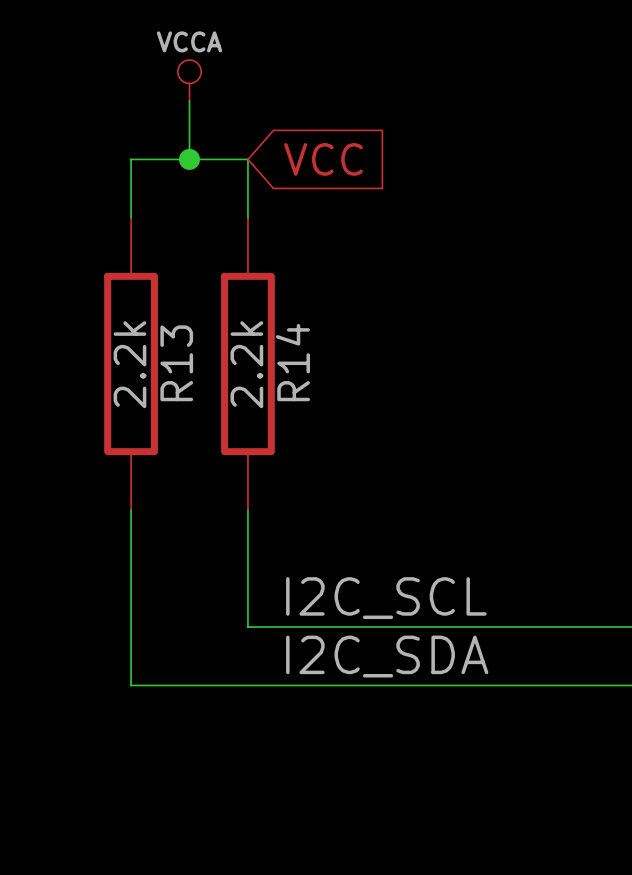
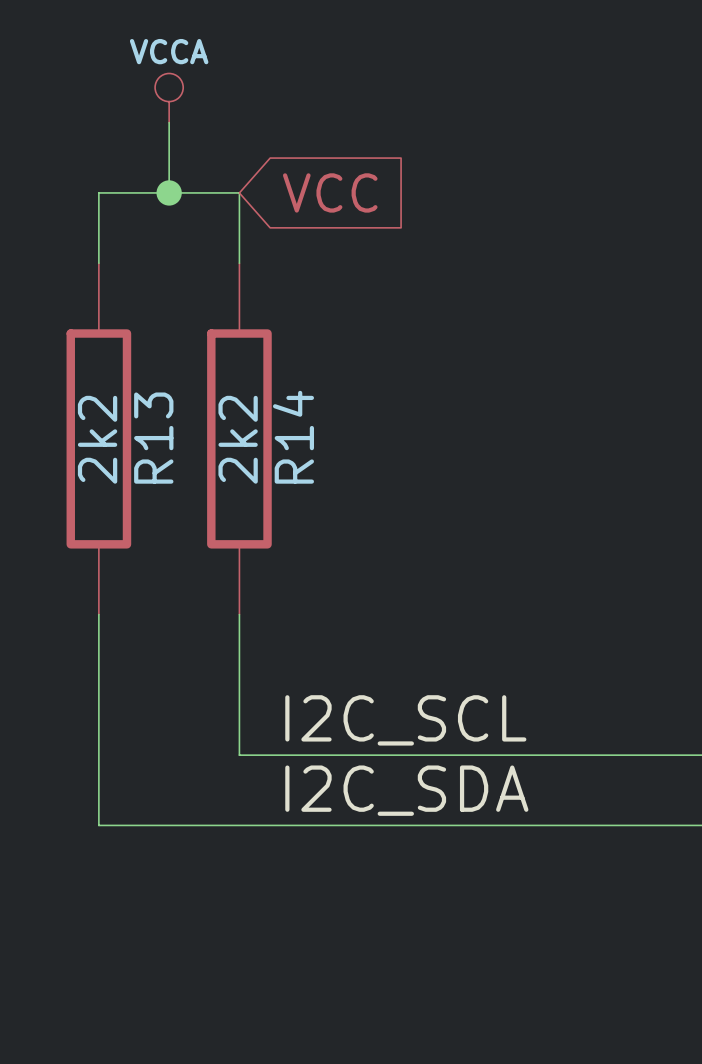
R13 value: 2.2k (129, 364) -> 2k2 (97, 439)
R14 value: 2.2k (246, 364) -> 2k2 (238, 439)

